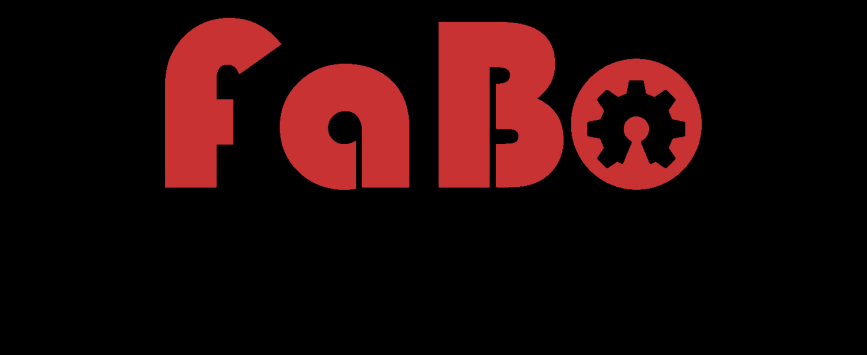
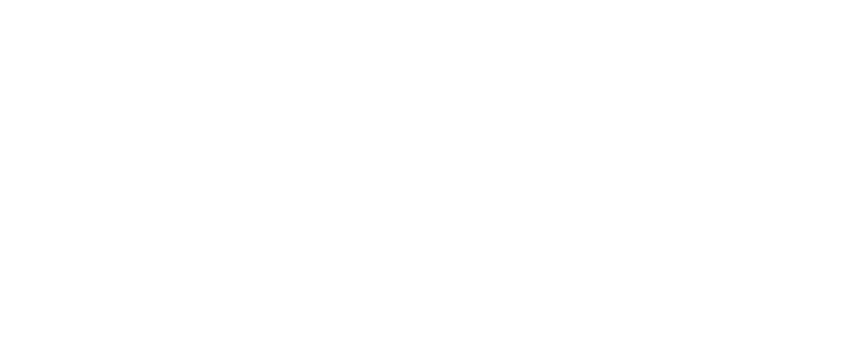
part: (433, 103) -> none

